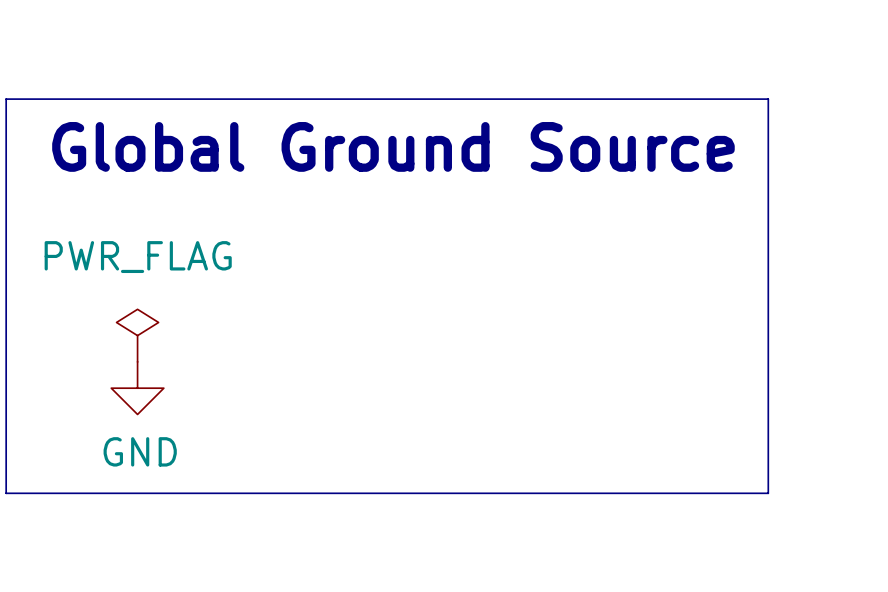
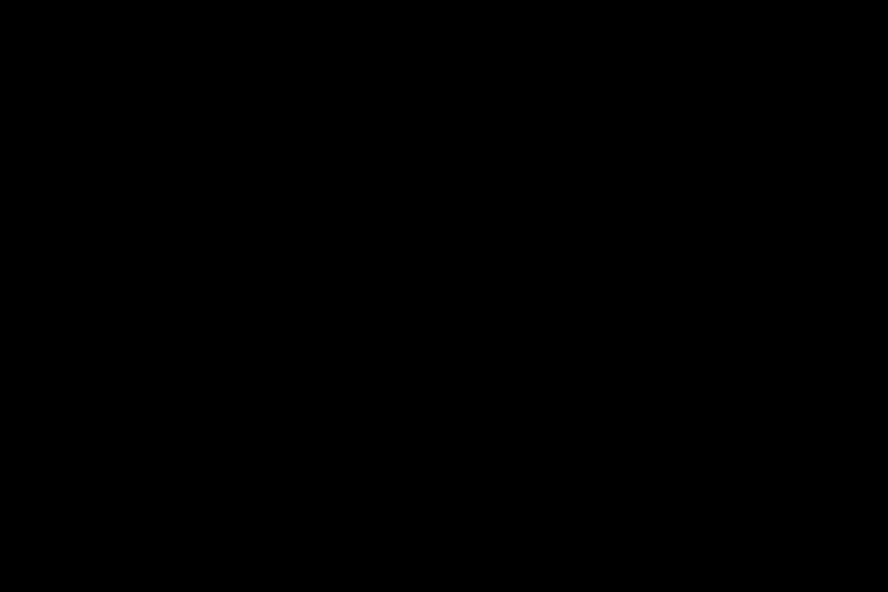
line: (6, 99) (768, 99) (768, 493) (6, 493) (6, 99) -> none
text: Global Ground Source (393, 146) -> none
power symbol: PWR_FLAG (137, 335) -> none
power symbol: GND (137, 388) -> none

